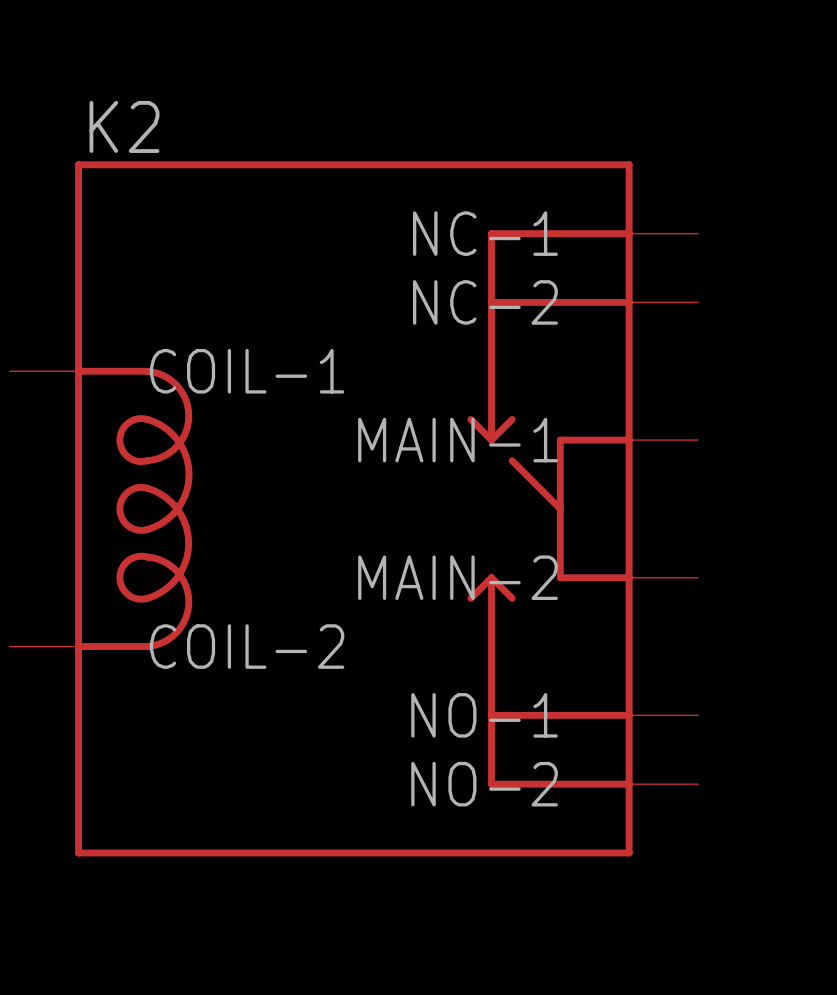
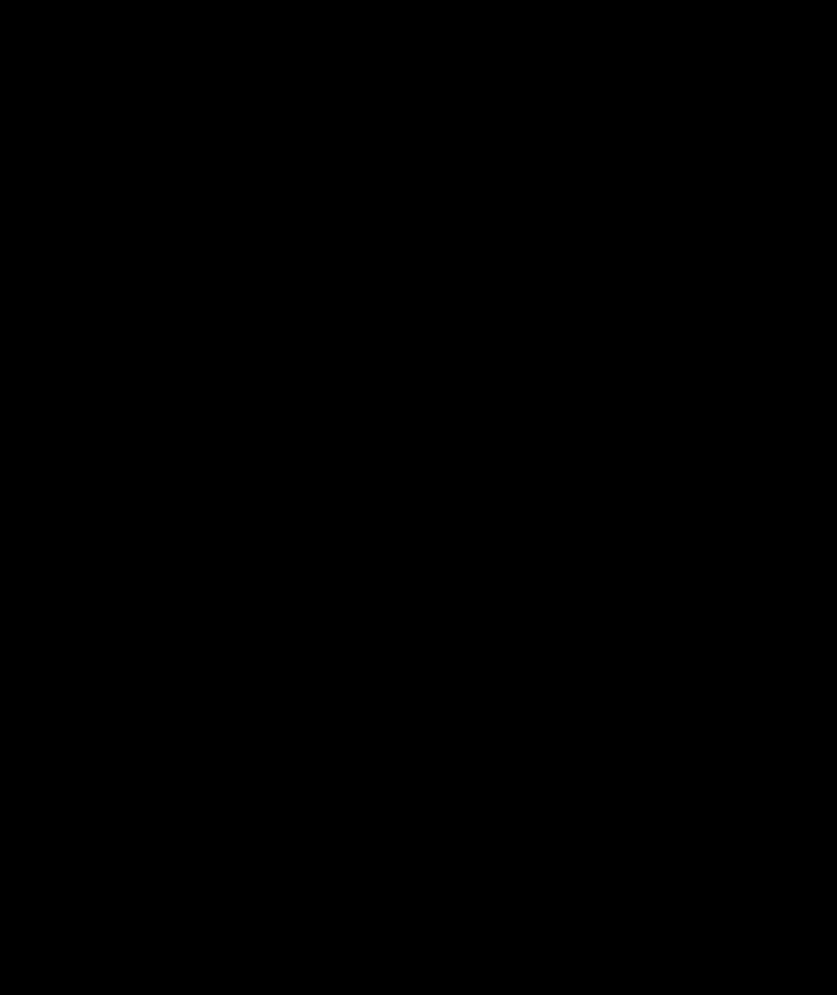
K2: (353, 508) -> none

